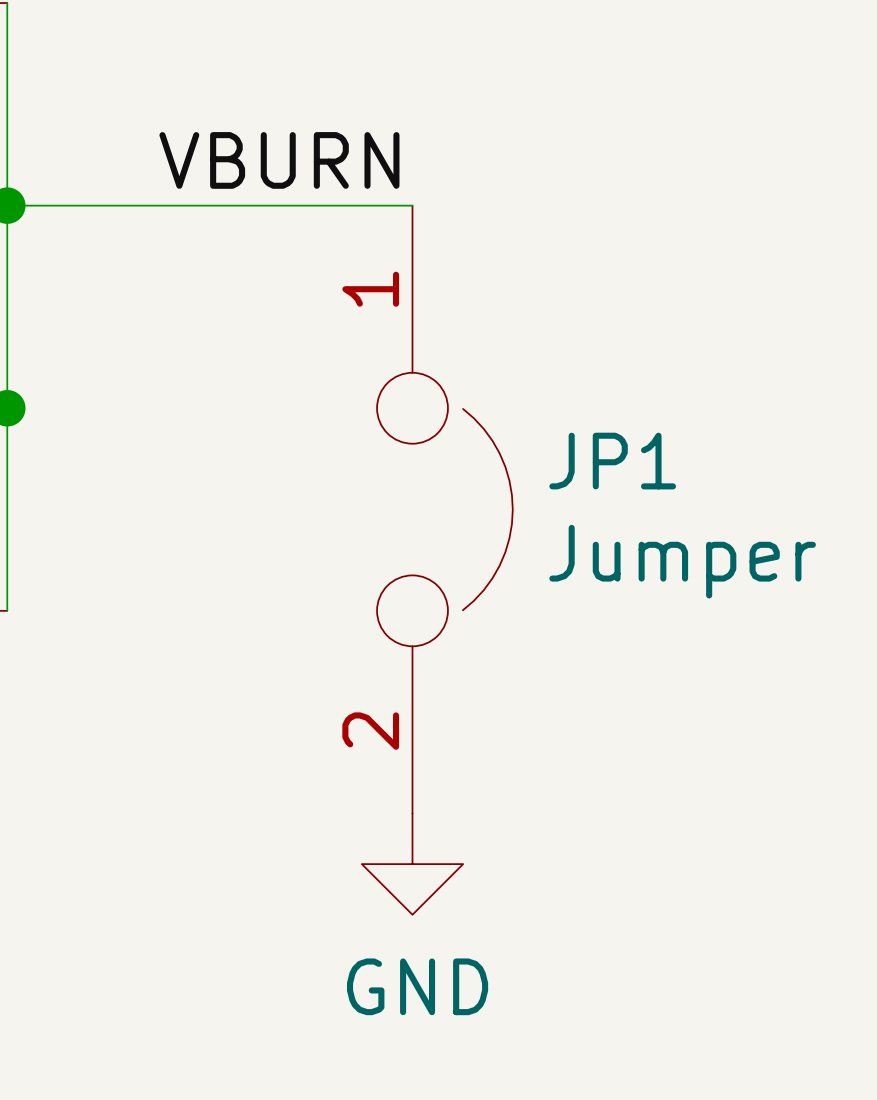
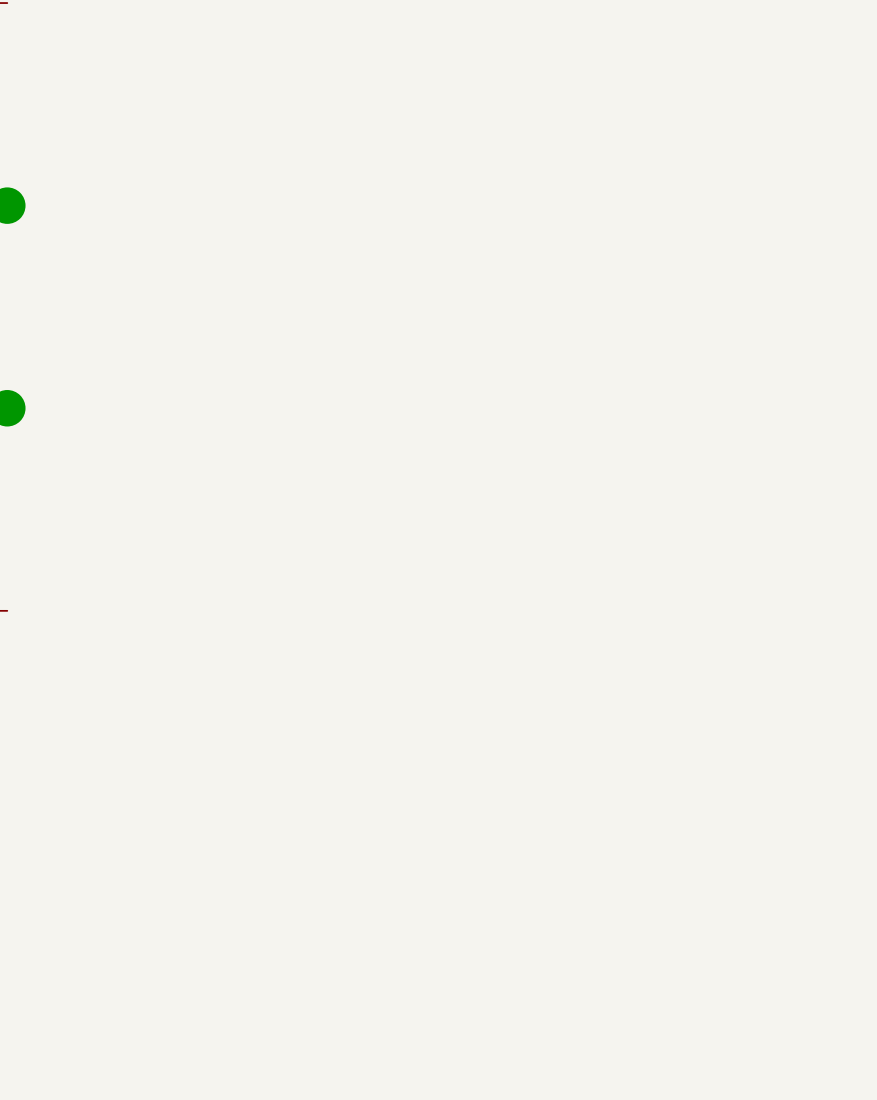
wire: (7, 3) (7, 610) -> none
label: VBURN (279, 160) -> none
wire: (7, 205) (412, 205) -> none
JP1: Jumper (444, 509) -> none
power symbol: GND (412, 864) -> none

